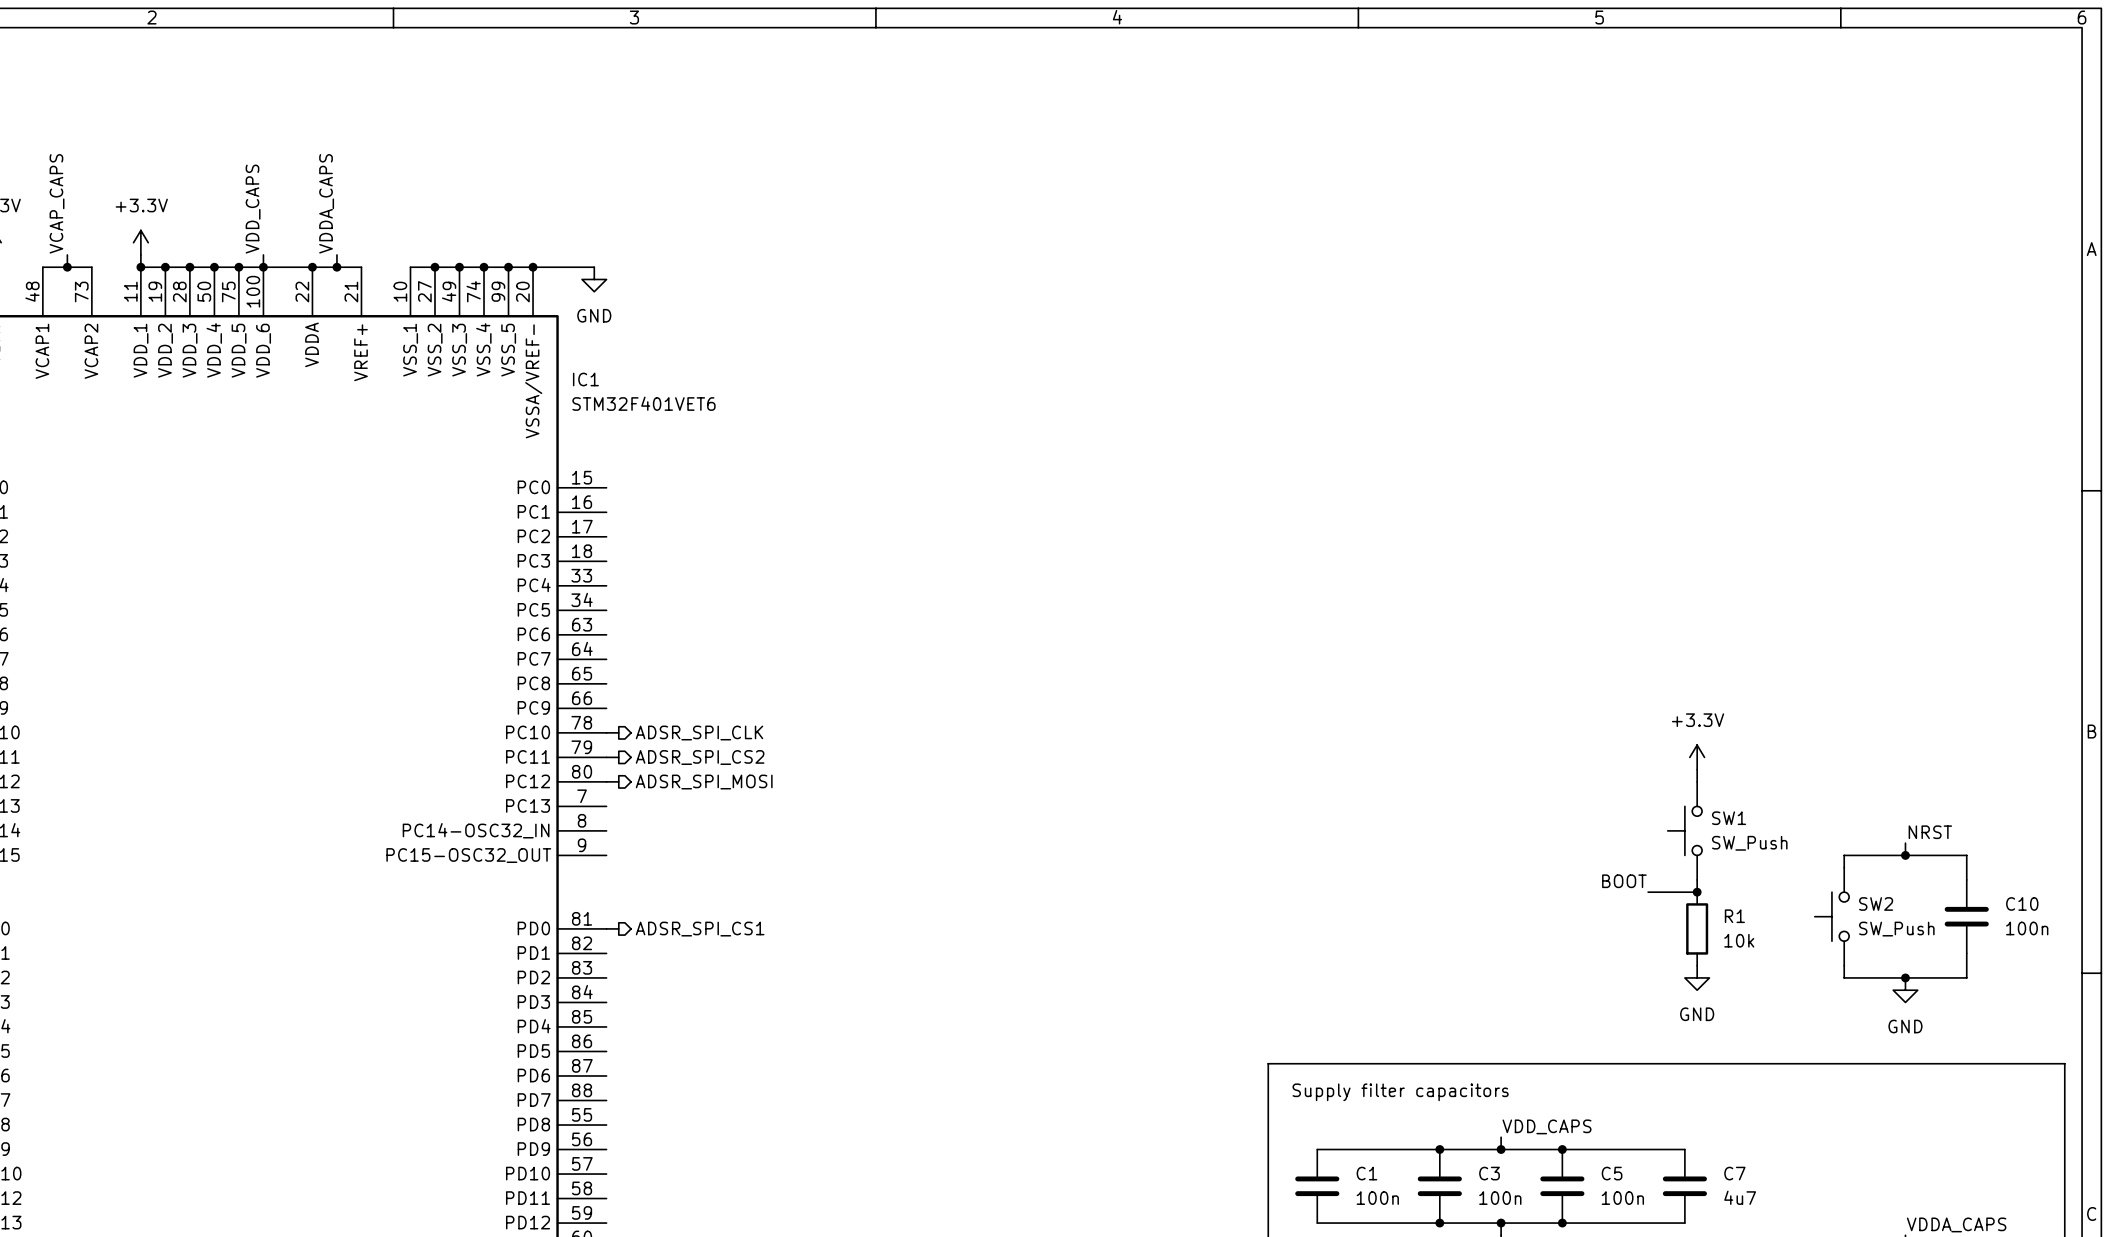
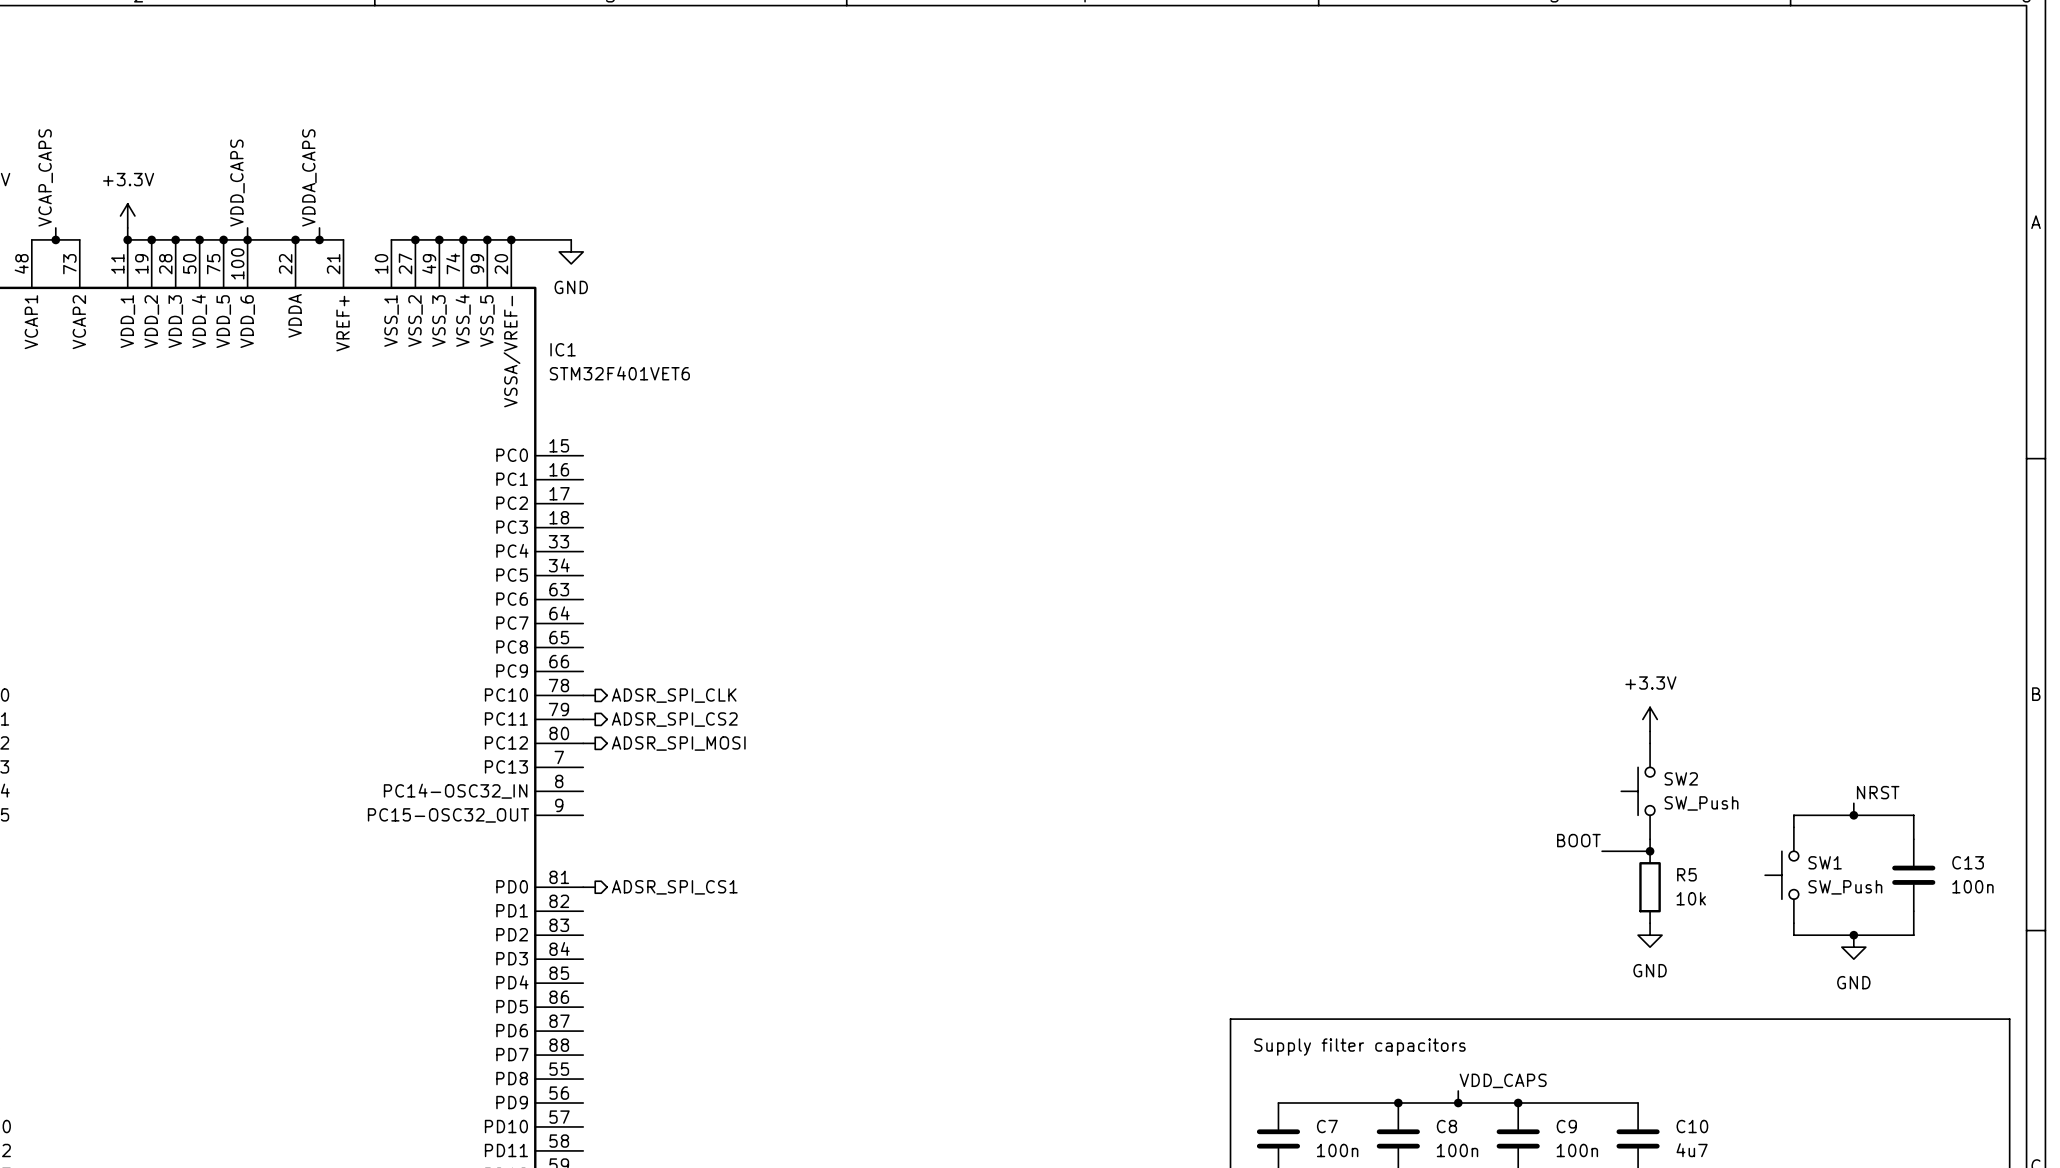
SW1 name: SW1 (1729, 818) -> SW2 (1681, 778)
SW2 name: SW2 (1876, 903) -> SW1 (1825, 862)
C10 name: C10 (2022, 903) -> C13 (1968, 862)
R1 name: R1 (1734, 916) -> R5 (1686, 874)
C1 name: C1 (1366, 1173) -> C7 (1327, 1126)
C3 name: C3 (1489, 1173) -> C8 (1446, 1126)
C5 name: C5 (1612, 1173) -> C9 (1566, 1126)
C7 name: C7 (1734, 1173) -> C10 (1692, 1126)

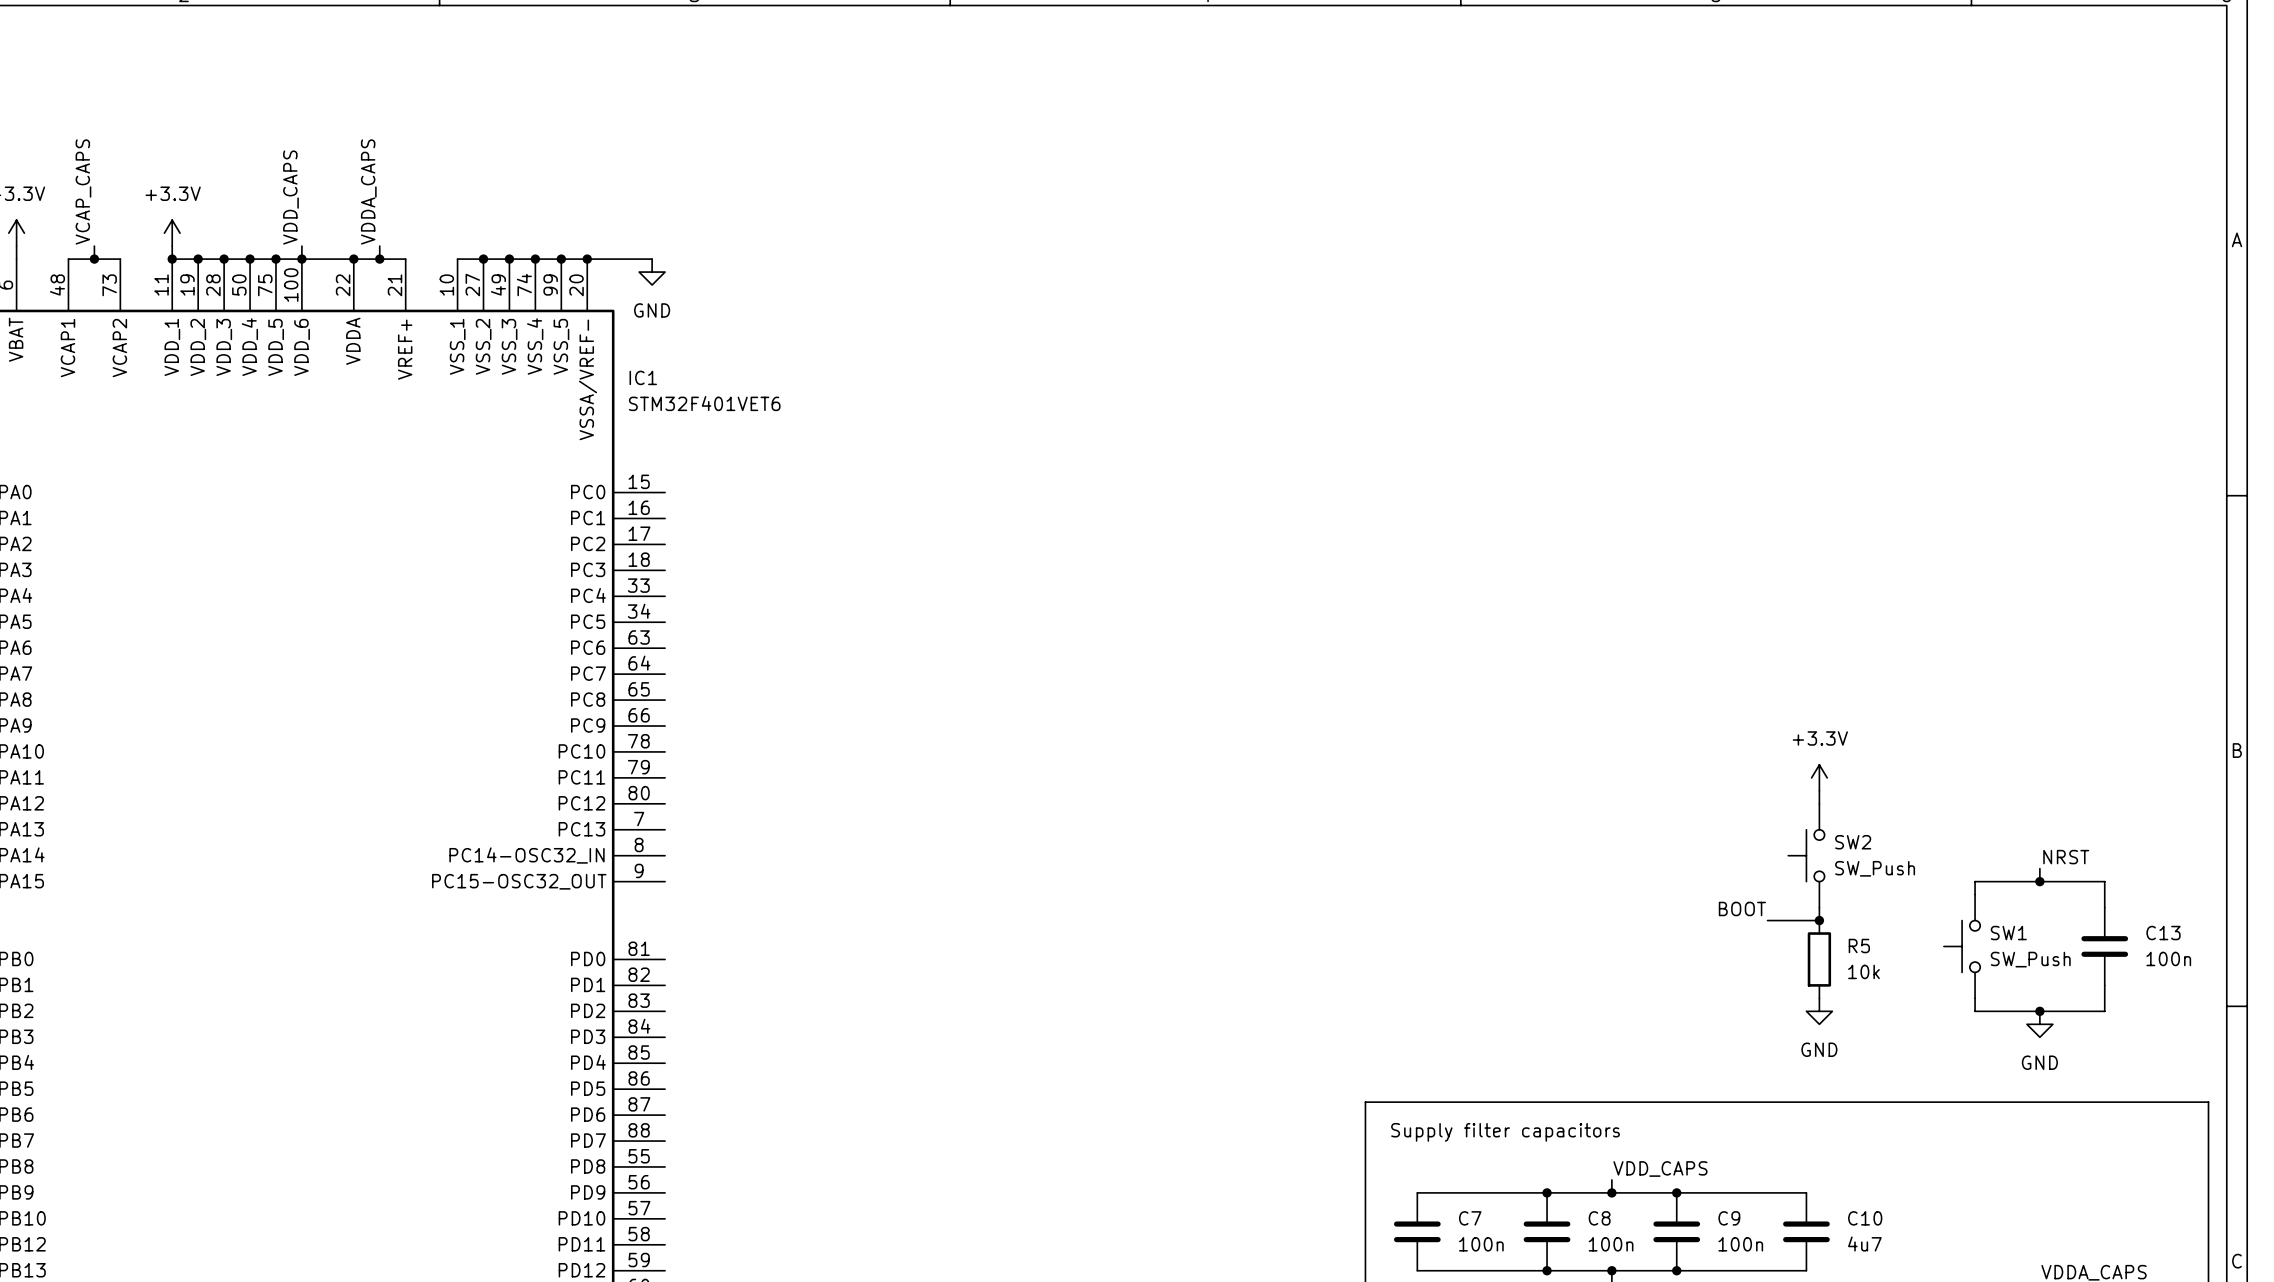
wire: (583, 695) (595, 695) -> none
hierarchical label: ADSR_SPI_CLK (674, 695) -> none
wire: (583, 719) (595, 719) -> none
hierarchical label: ADSR_SPI_CS2 (674, 719) -> none
wire: (583, 743) (595, 743) -> none
hierarchical label: ADSR_SPI_MOSI (678, 743) -> none
wire: (583, 887) (595, 887) -> none
hierarchical label: ADSR_SPI_CS1 (674, 887) -> none

